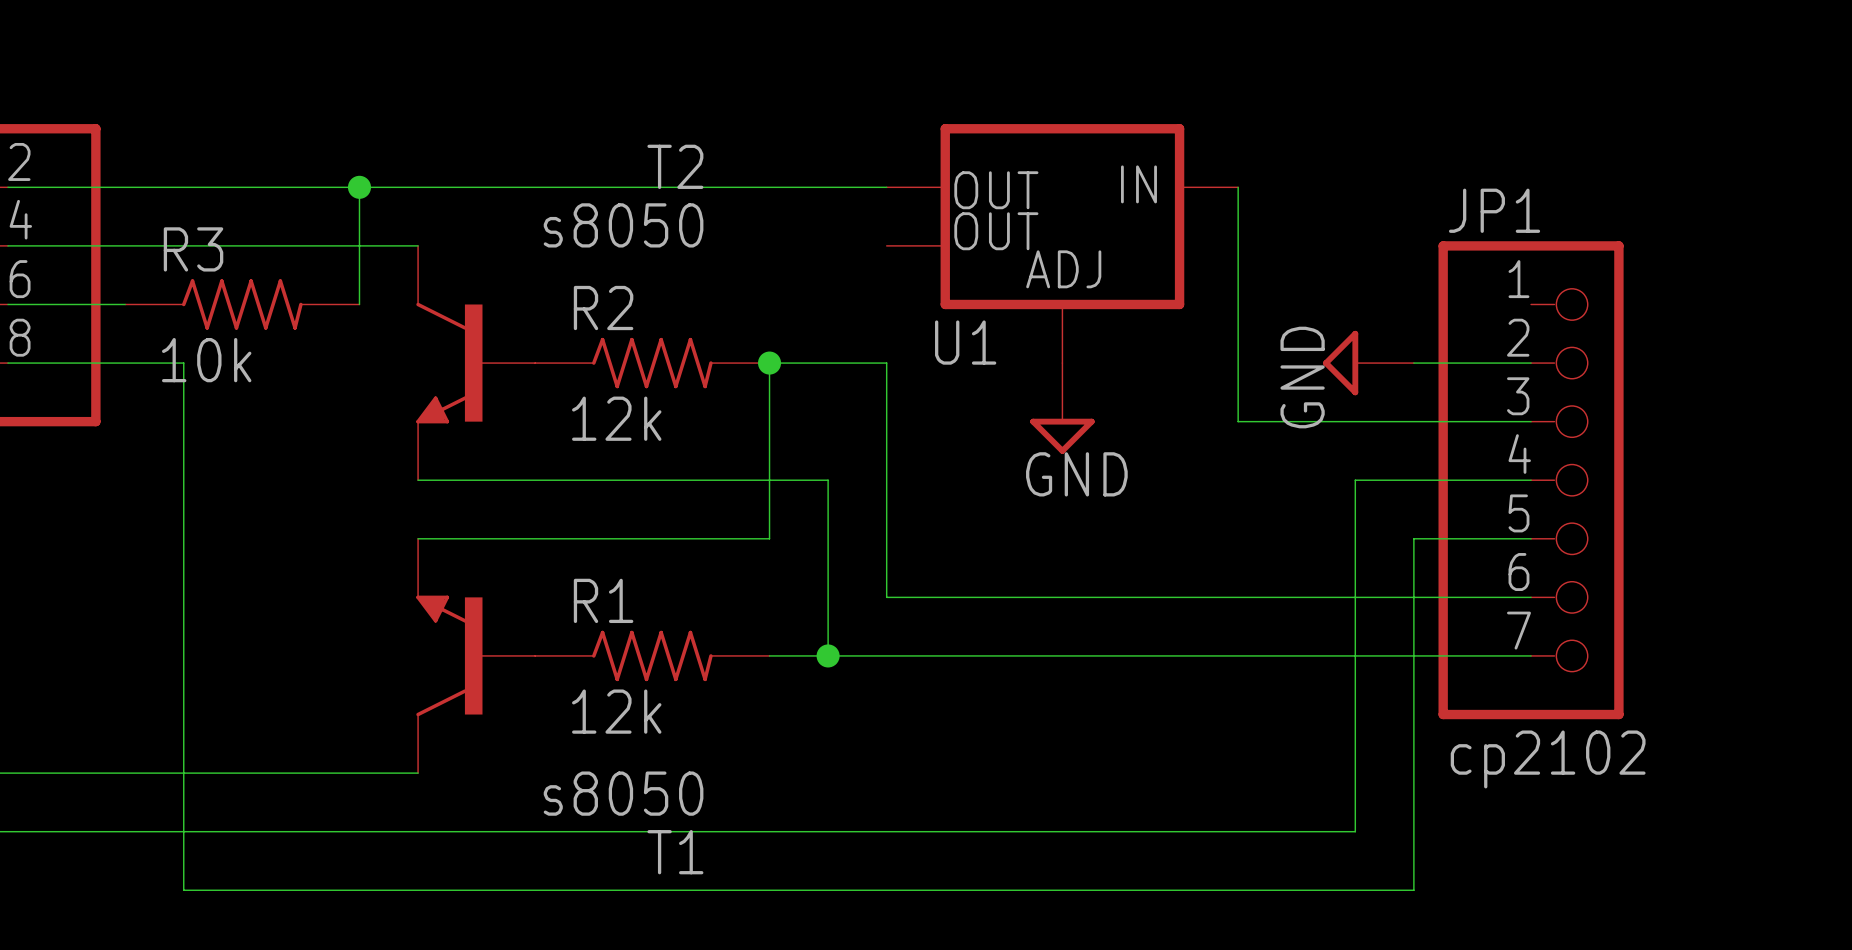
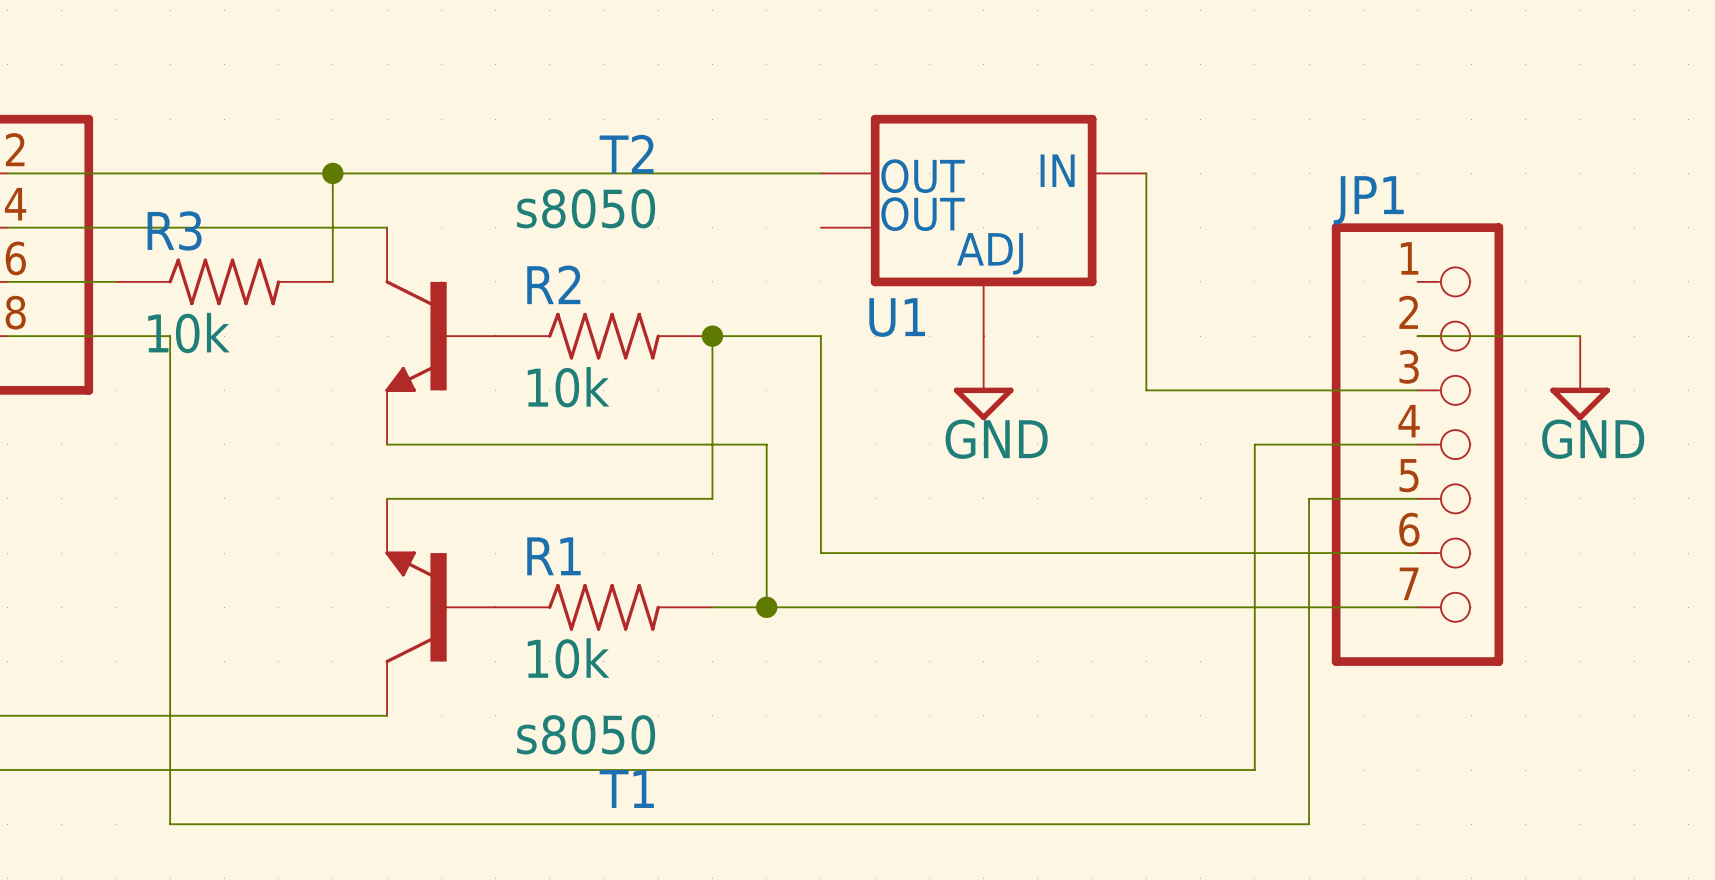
power symbol rotation: 0° (1340, 363) -> 90° counterclockwise (1580, 403)
power symbol position: GND (1368, 363) -> GND (1580, 378)
wire: (1413, 363) (1531, 363) -> (1580, 336) (1417, 336)
R2 value: 12k (616, 418) -> 10k (568, 387)
R1 value: 12k (616, 711) -> 10k (568, 658)
JP1 value: cp2102 (1548, 759) -> none

